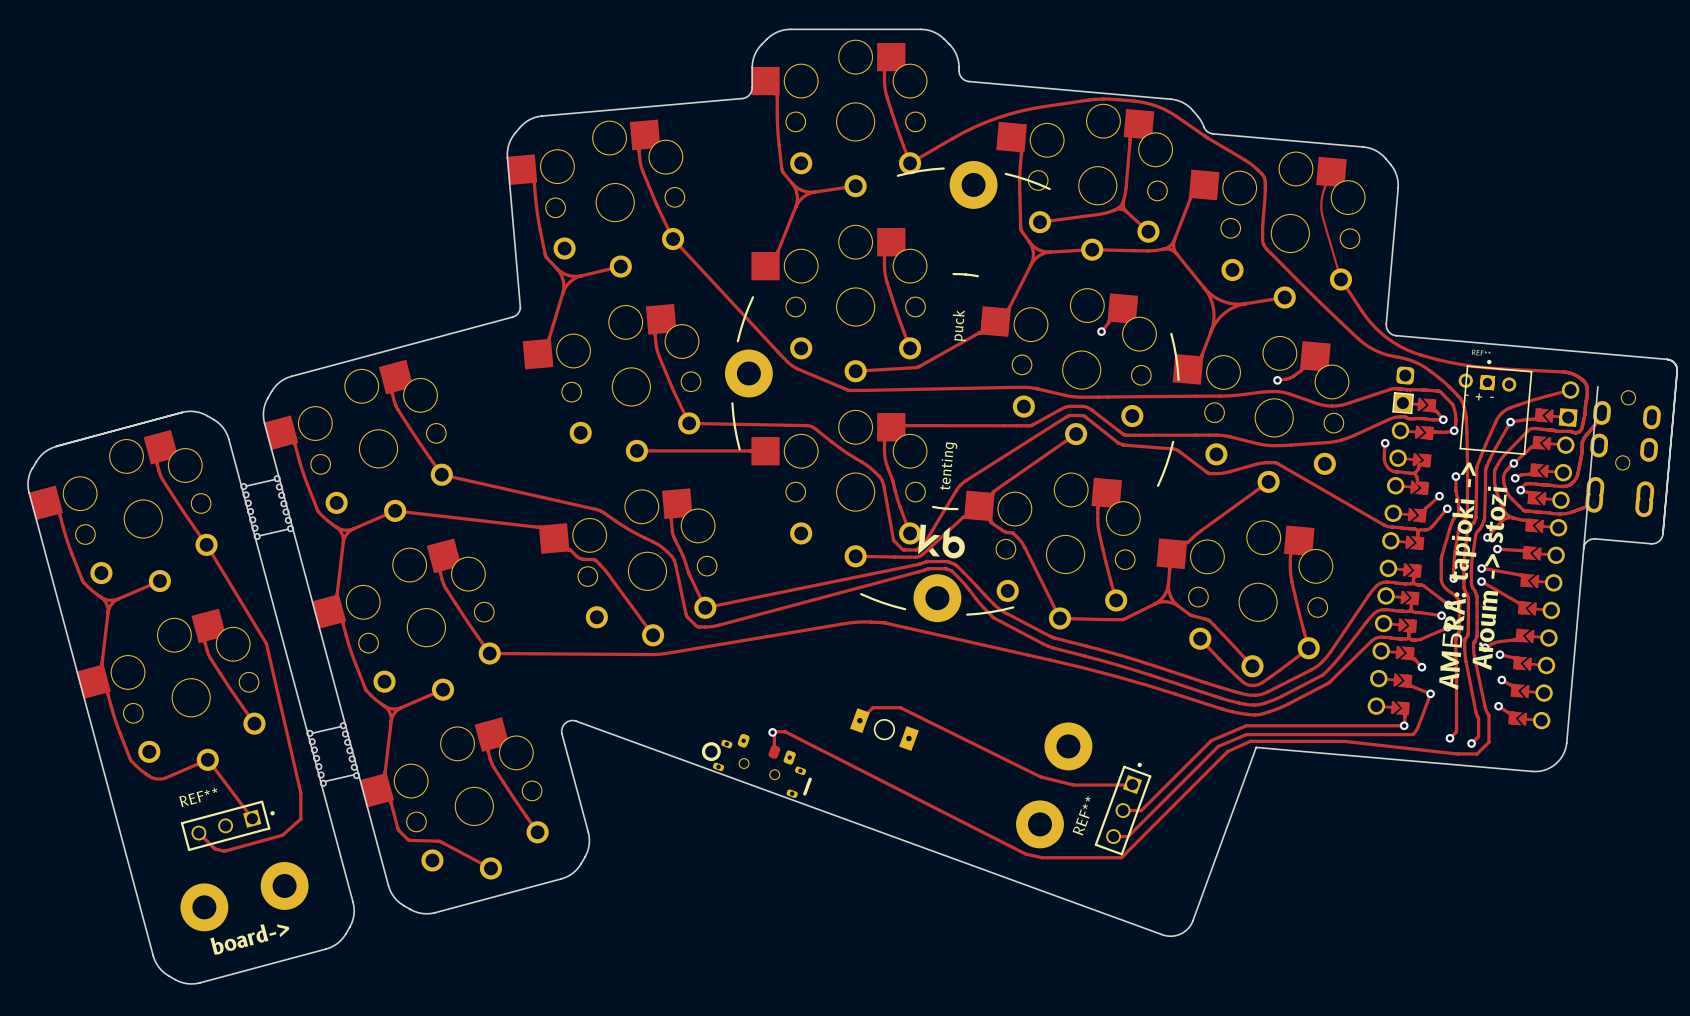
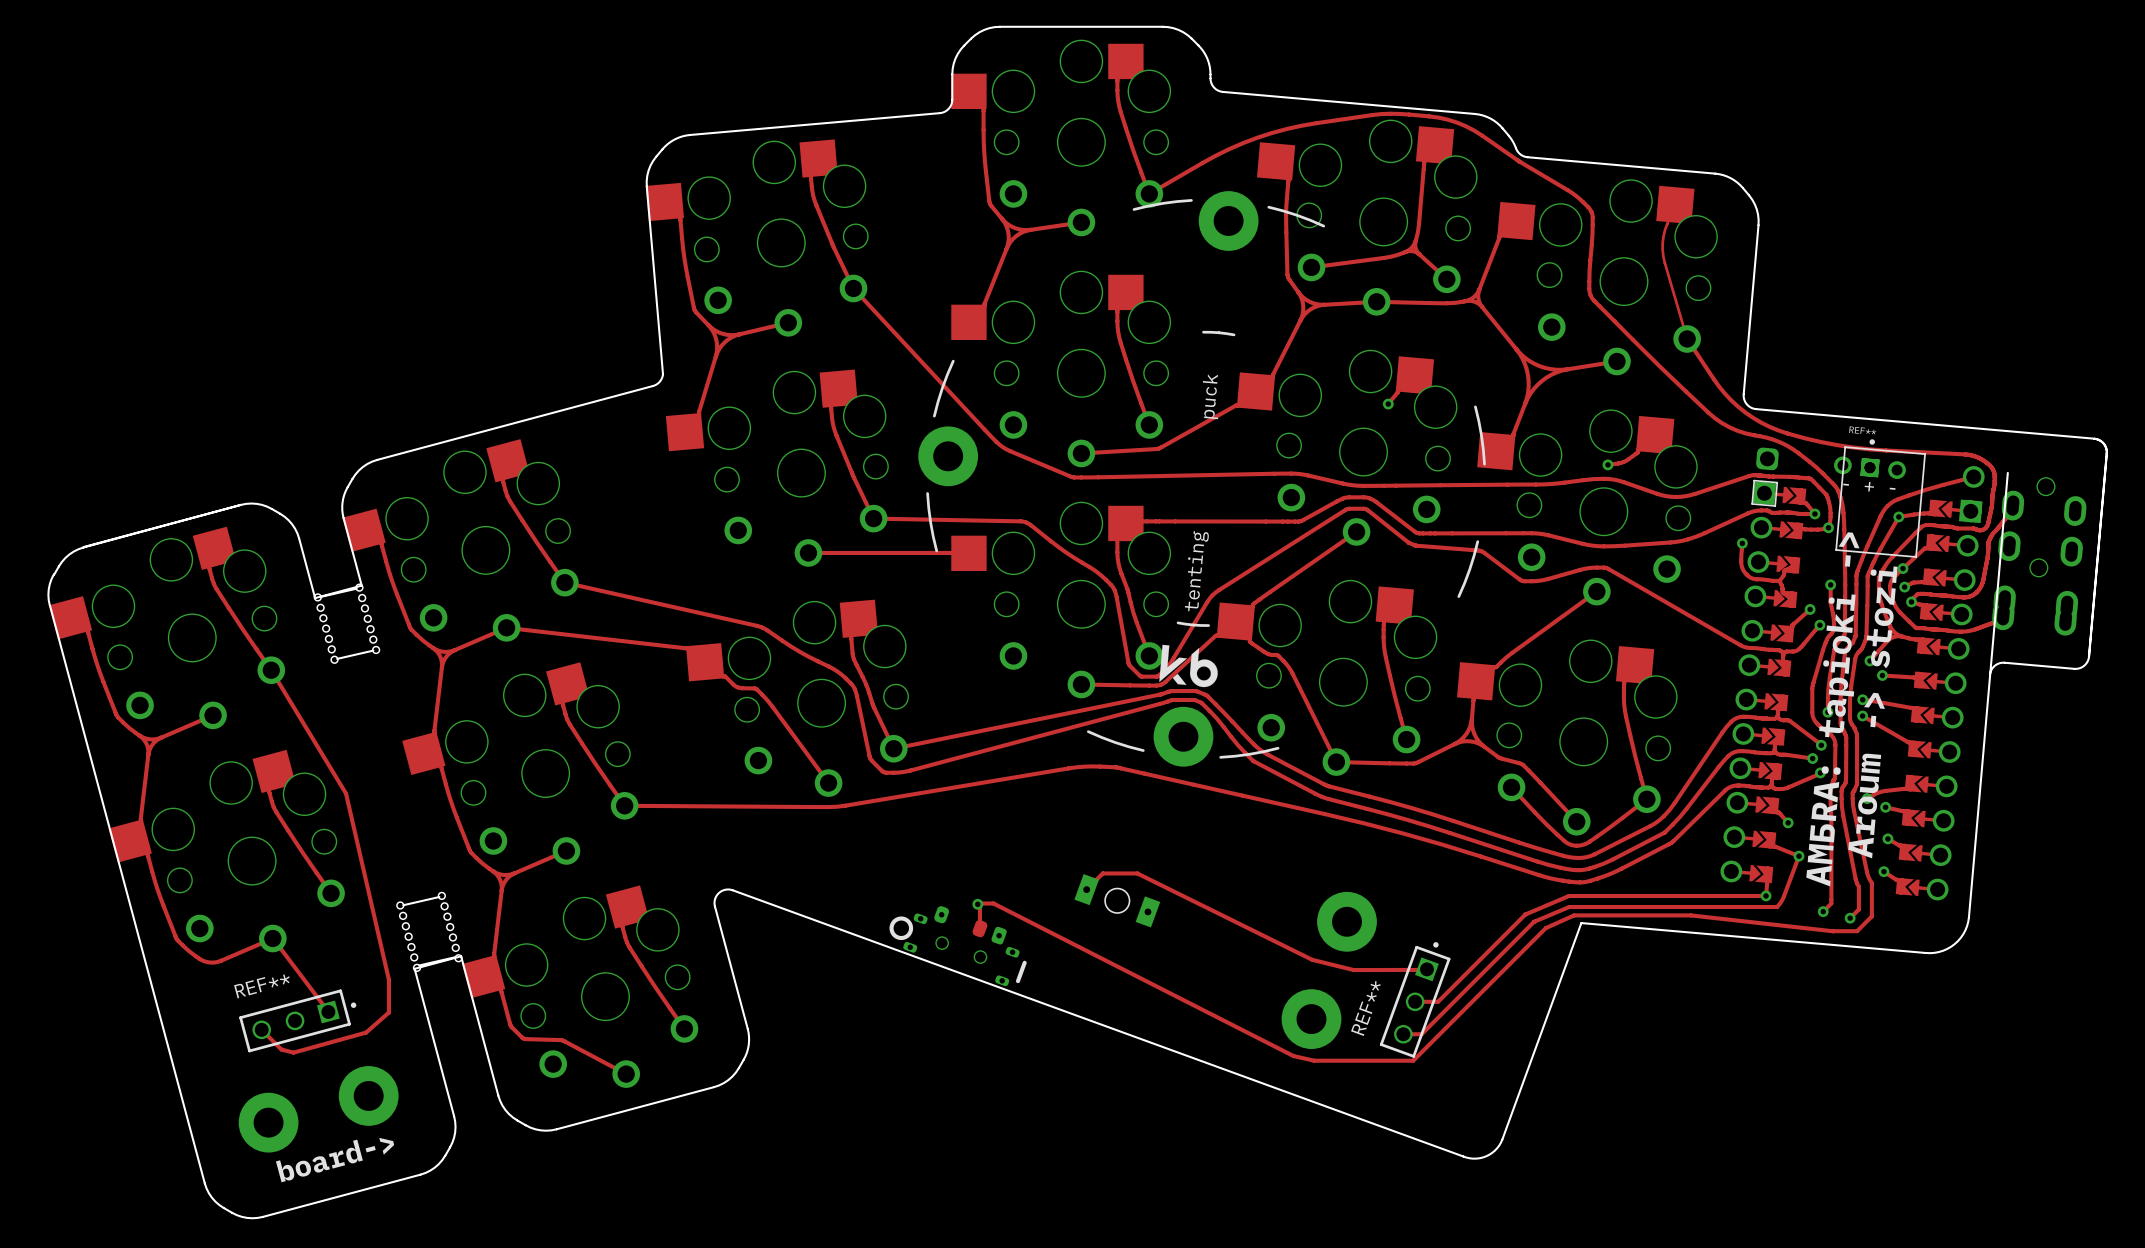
board edge: (264, 423) (388, 885) -> (343, 518) (361, 585) (315, 598) (299, 538)
board edge: (228, 439) (353, 902) -> (498, 1095) (461, 956) (414, 968) (454, 1116)

